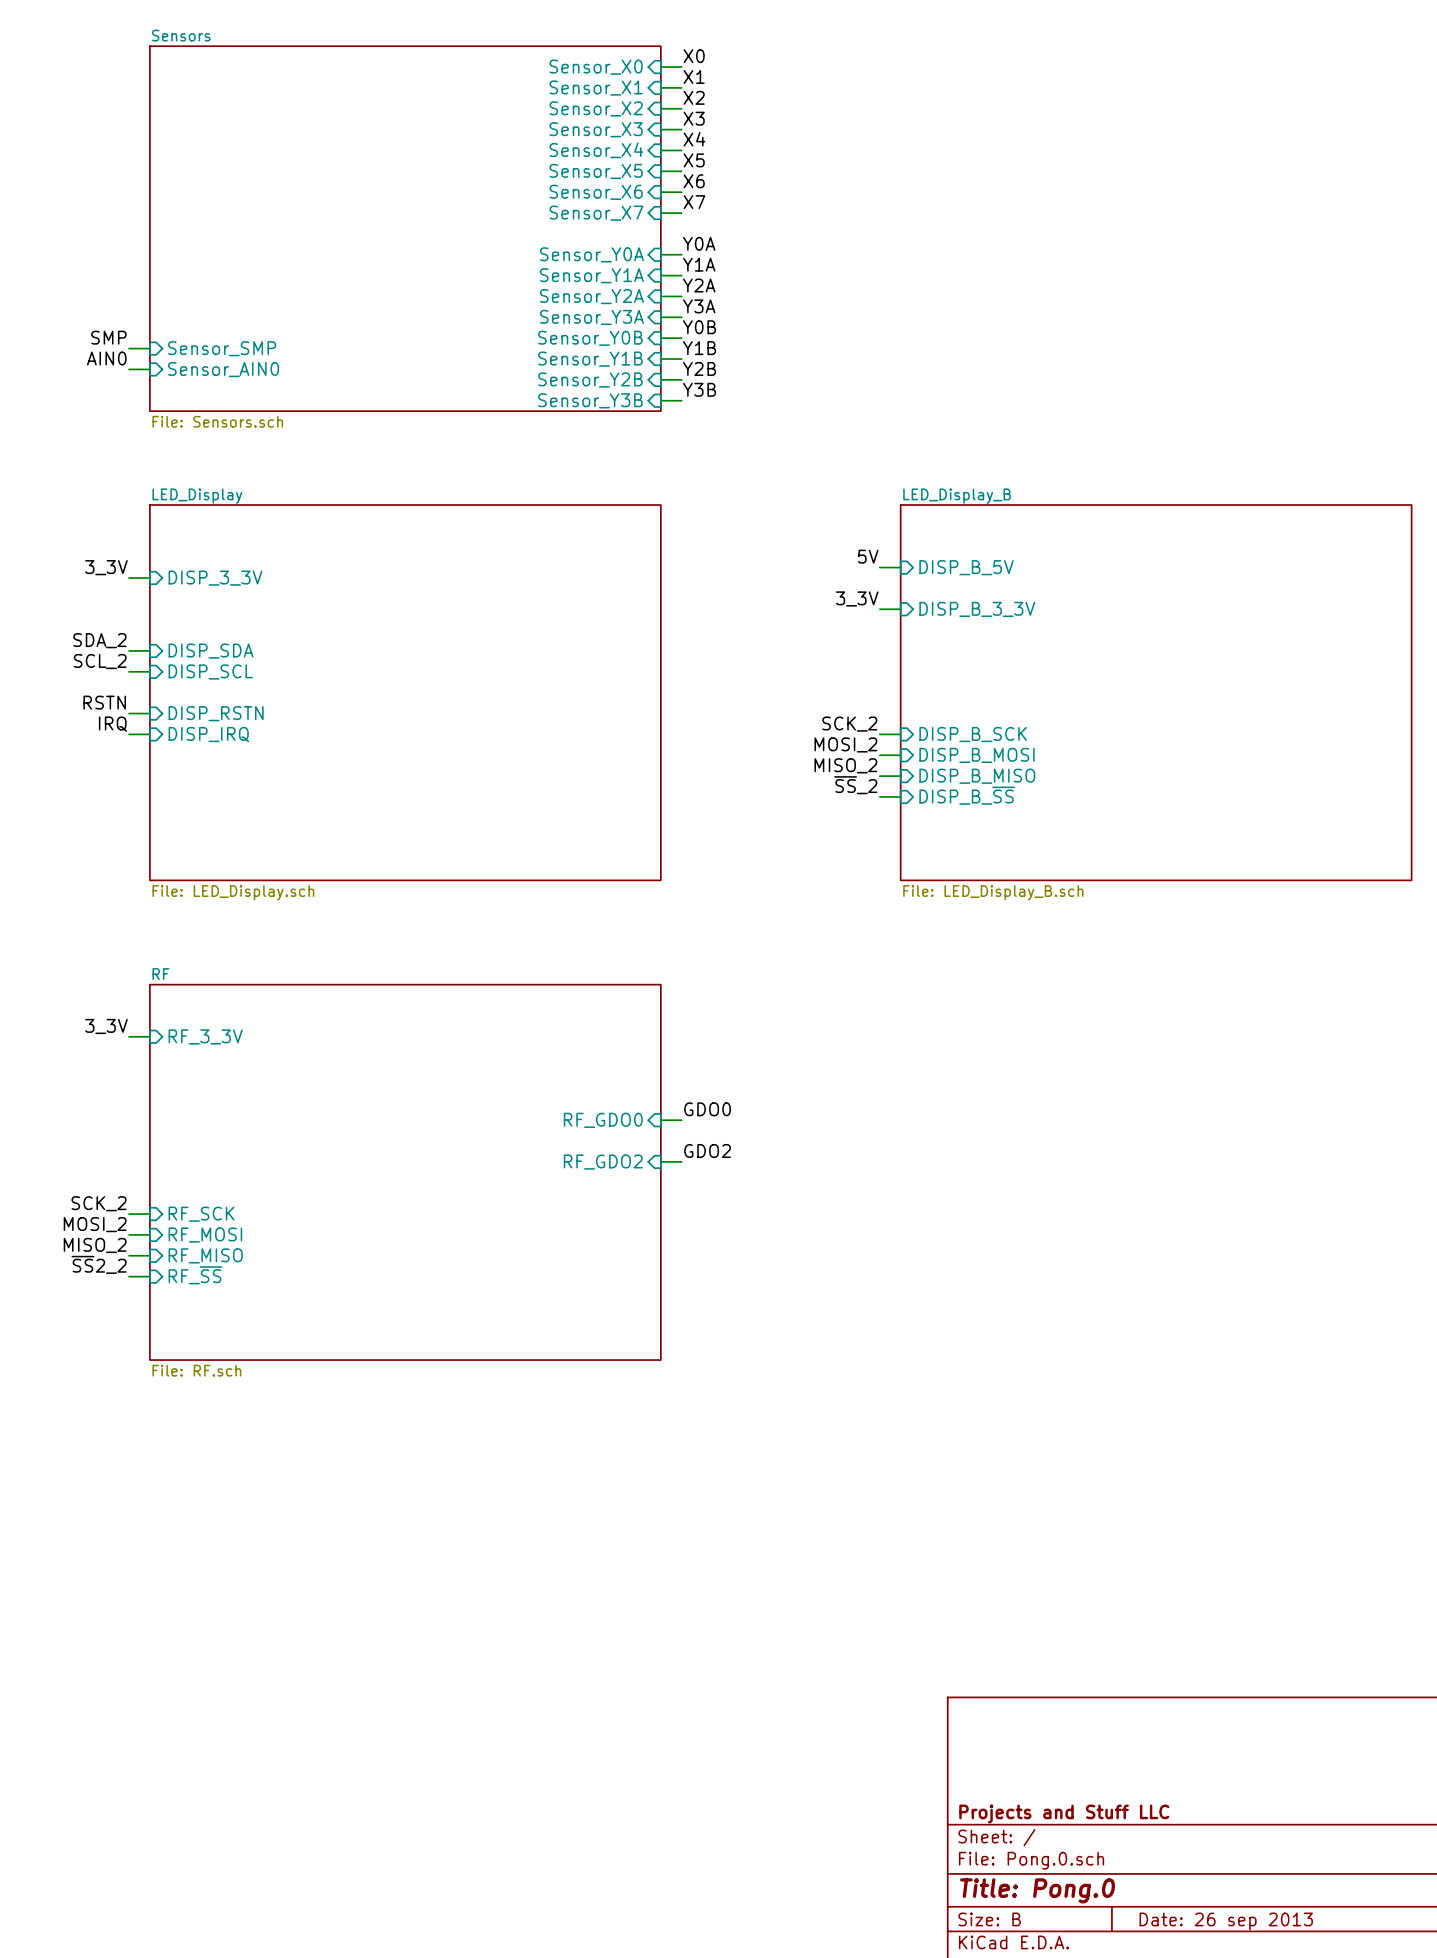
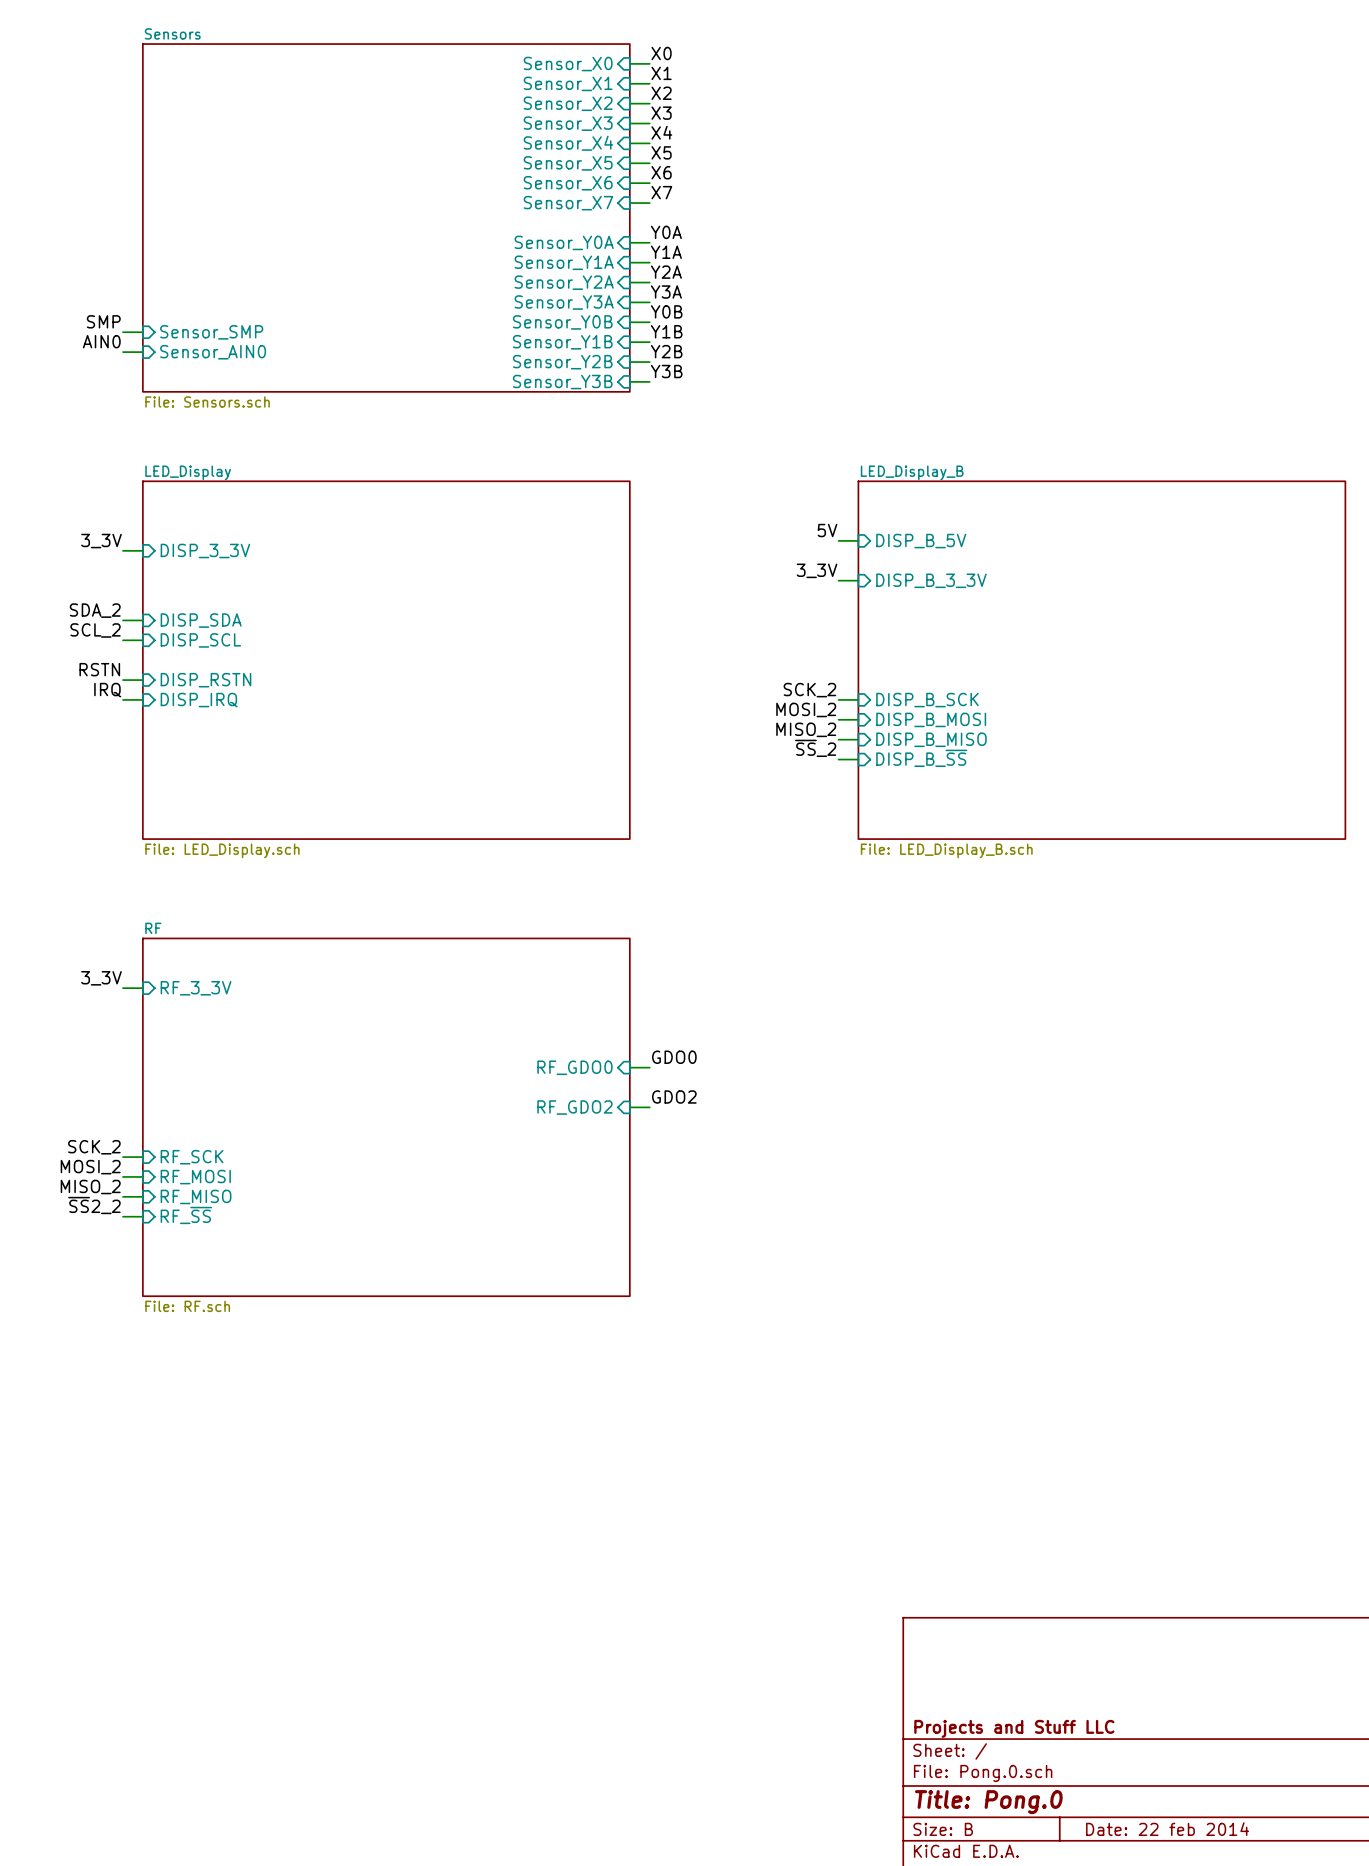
title block: Date: 26 sep 2013 (1226, 1921) -> Date: 22 feb 2014 (1167, 1829)

